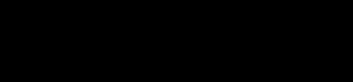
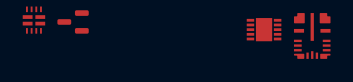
part: none -> (33, 20)
part: none -> (73, 21)
part: none -> (264, 29)
part: none -> (312, 35)

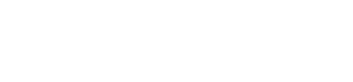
part: (33, 20) -> none
part: (73, 21) -> none
part: (264, 29) -> none
part: (312, 35) -> none

